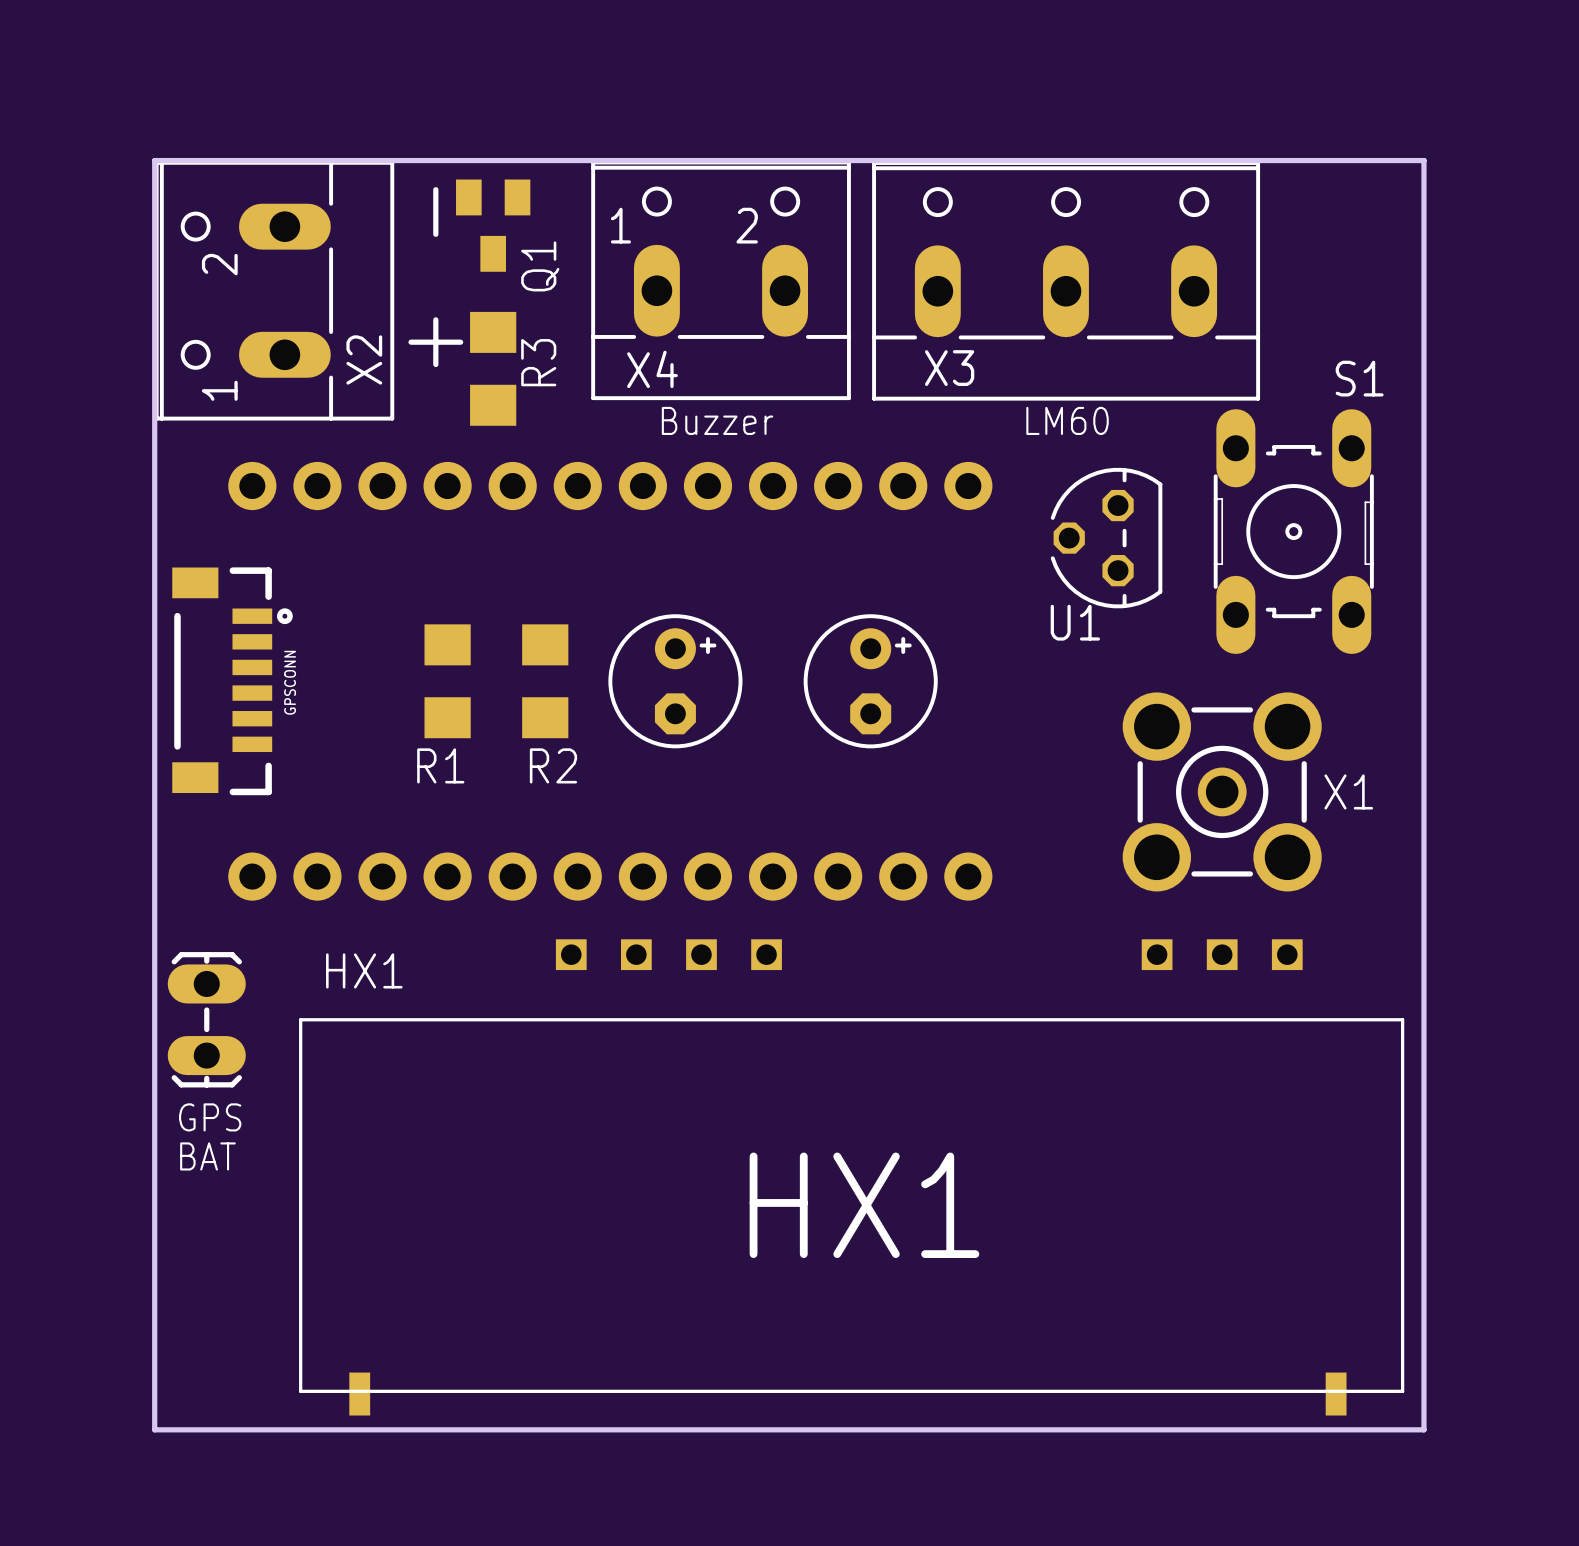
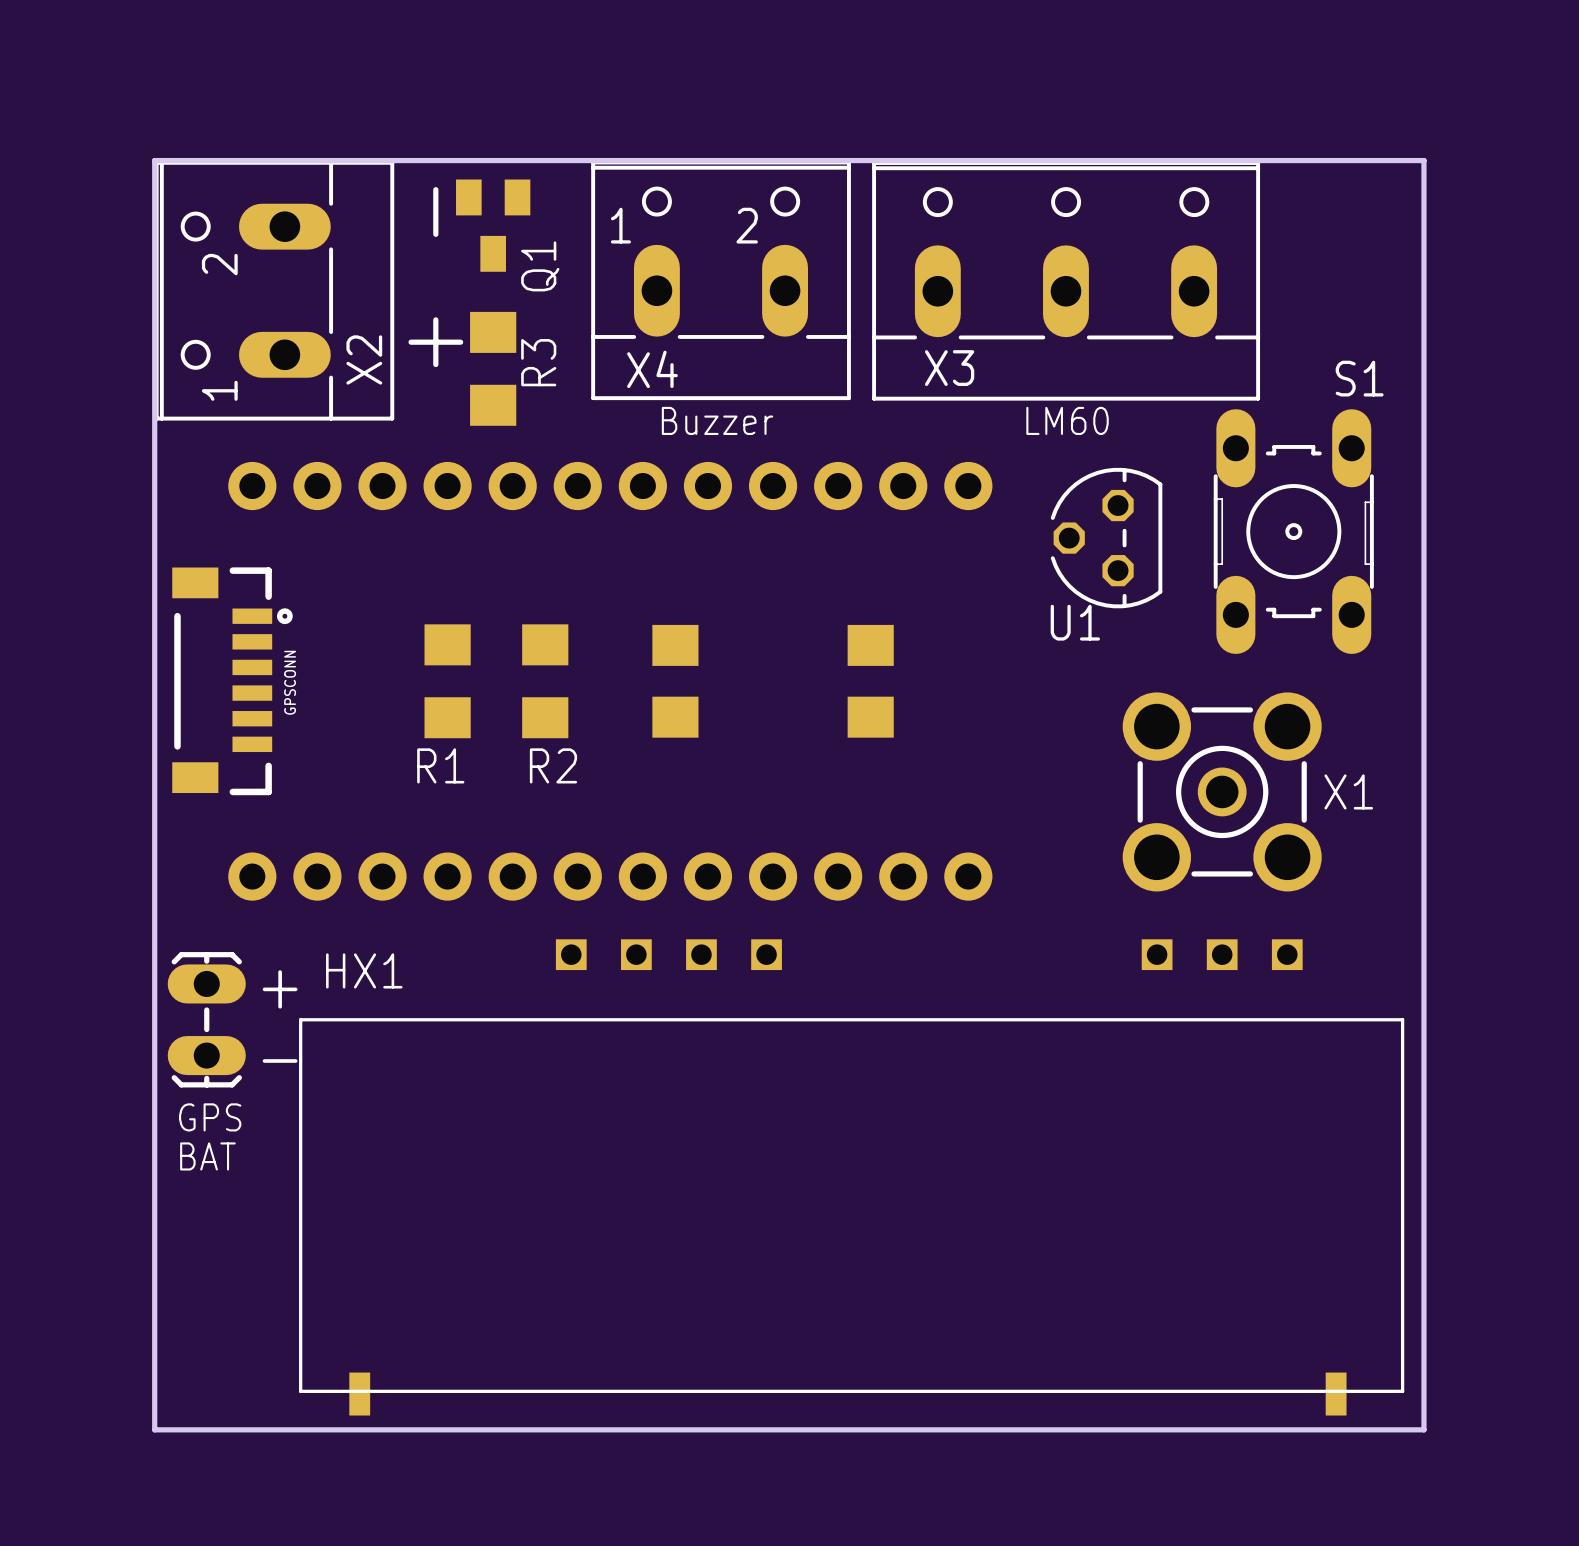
part footprint: [608, 614, 743, 749] -> [652, 624, 699, 738]
part footprint: [803, 614, 938, 749] -> [847, 624, 894, 738]
text: none -> + (280, 989)
text: none -> - (280, 1060)
text: HX1 (864, 1205) -> none

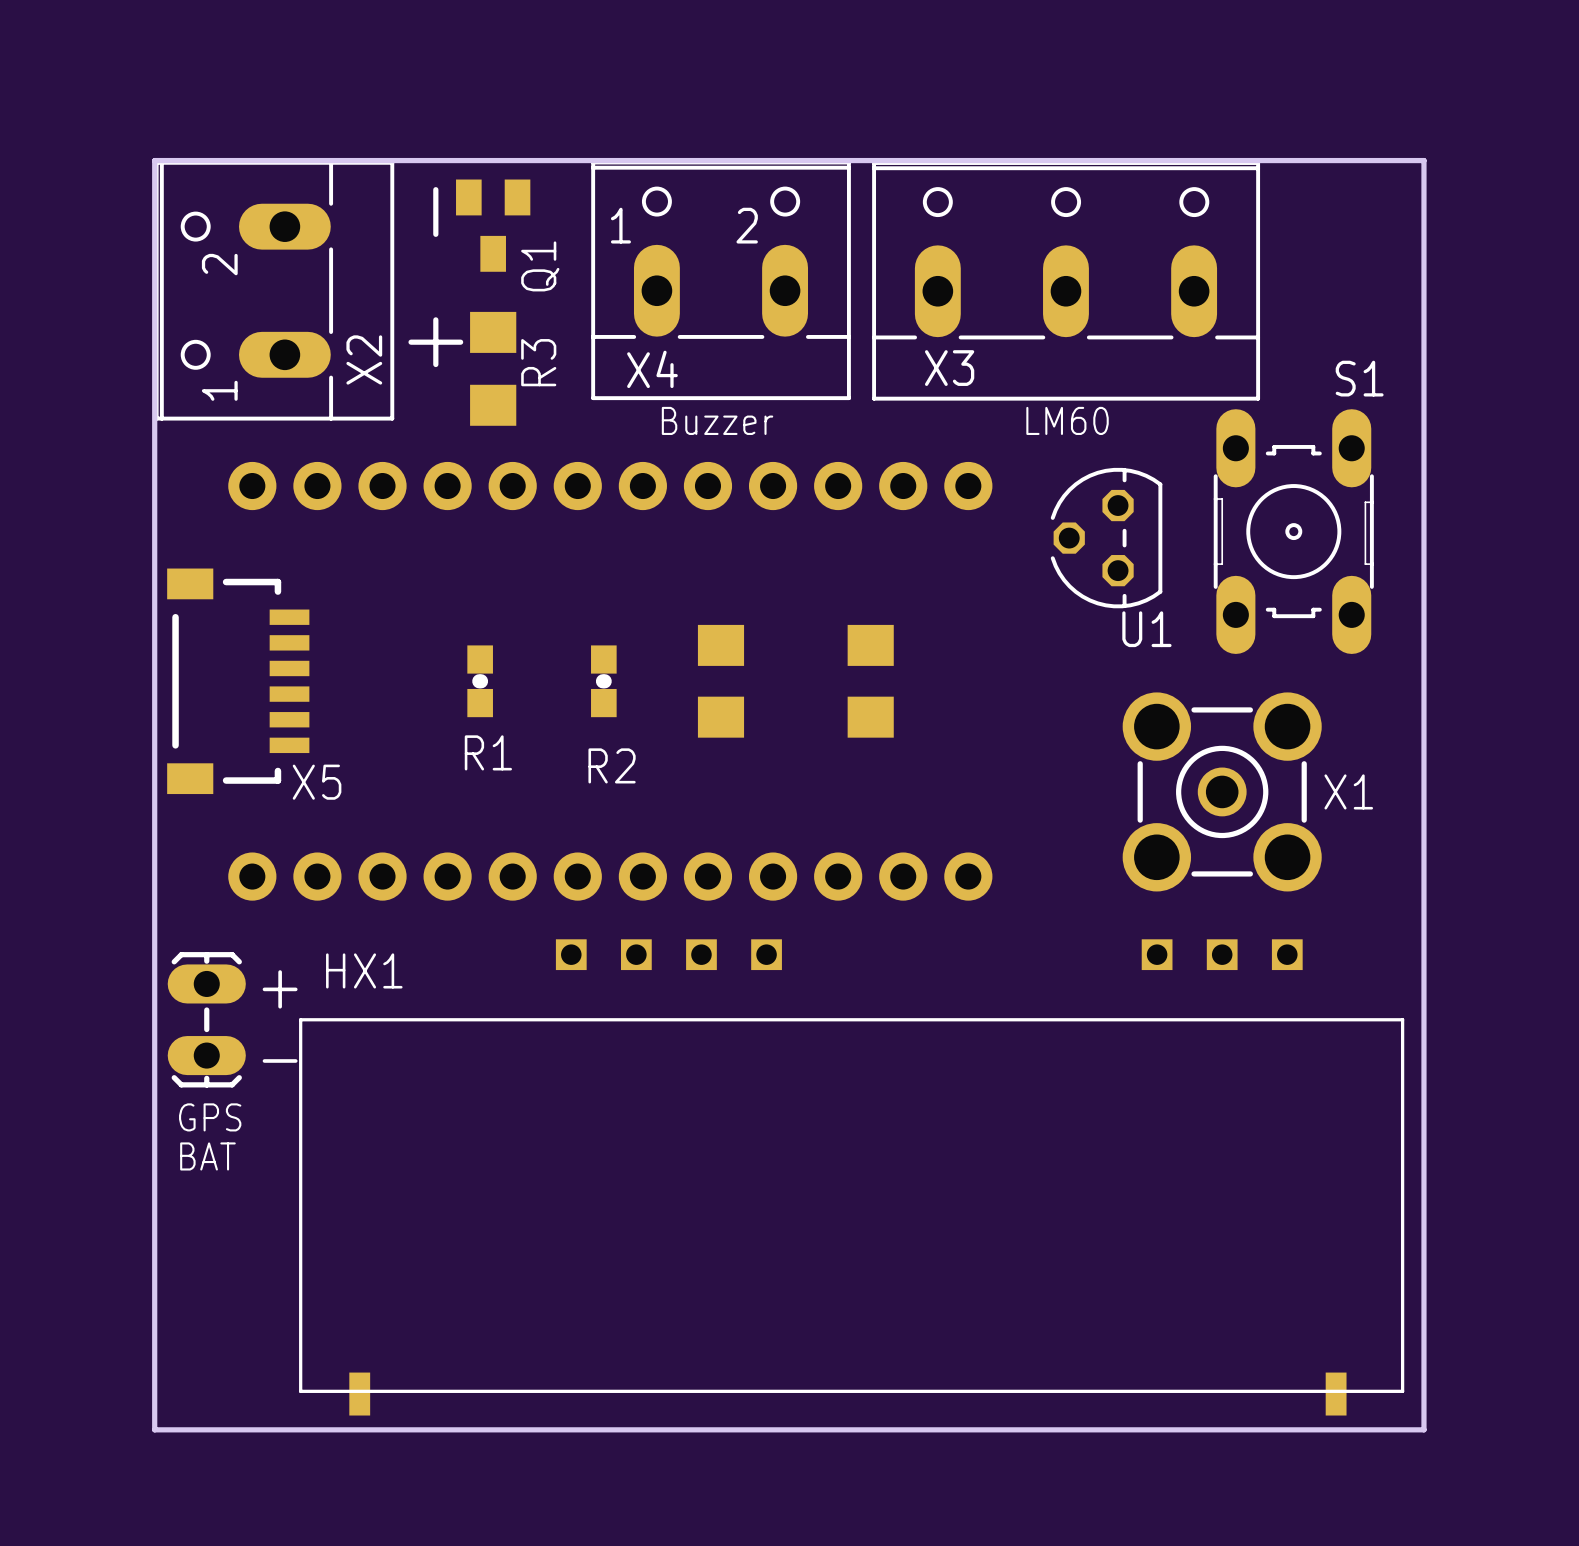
U1 name position: U1 (1075, 622) -> U1 (1146, 629)
R1 footprint: [424, 624, 471, 739] -> [467, 645, 493, 718]
R2 footprint: [522, 624, 569, 739] -> [591, 645, 617, 718]
GPSCONN: (232, 681) -> none
X5: none -> (238, 681)
part position: (675, 681) -> (720, 681)

